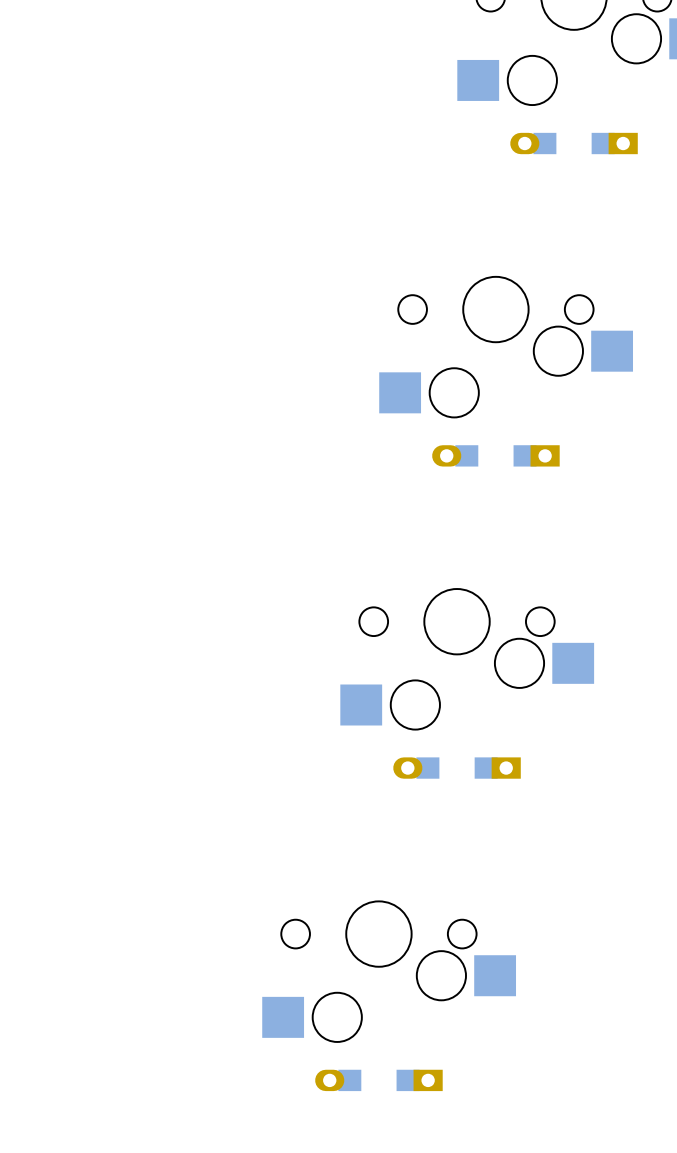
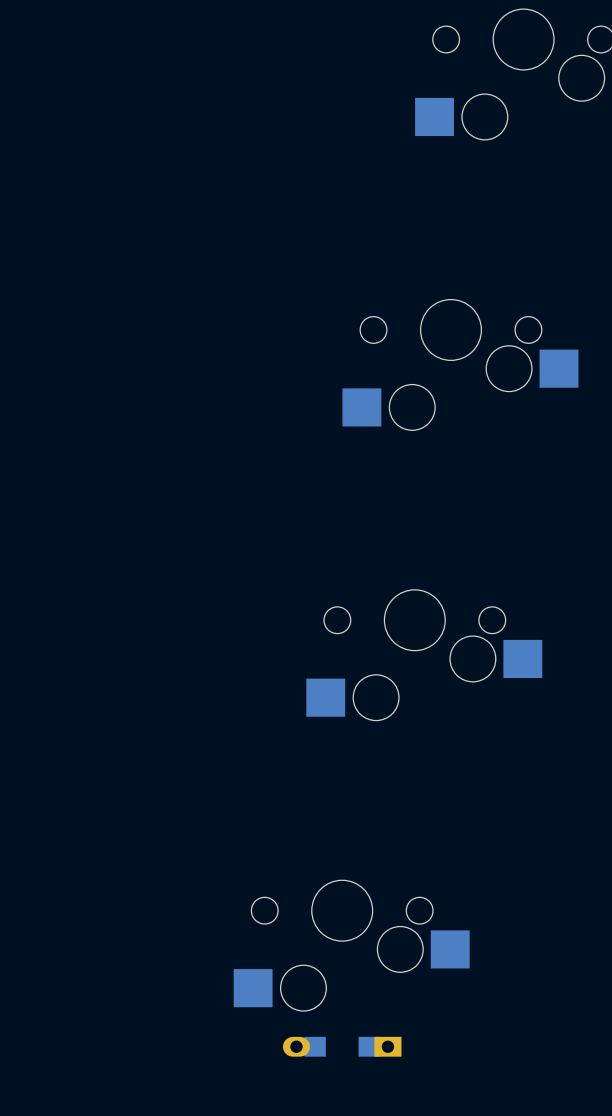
part: (574, 143) -> none
part: (495, 455) -> none
part: (457, 768) -> none

